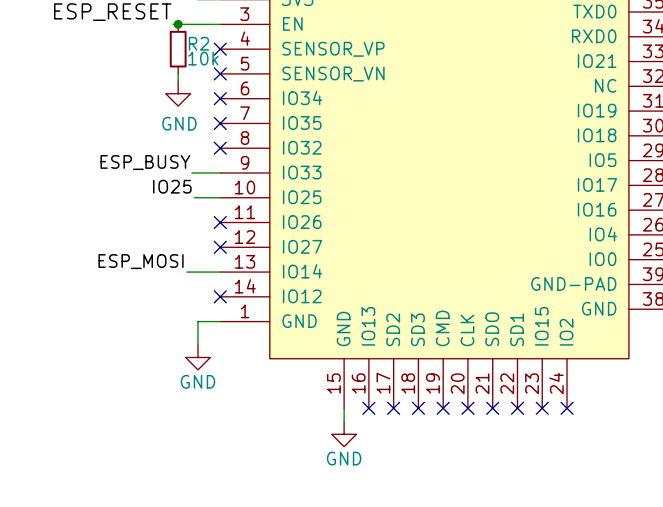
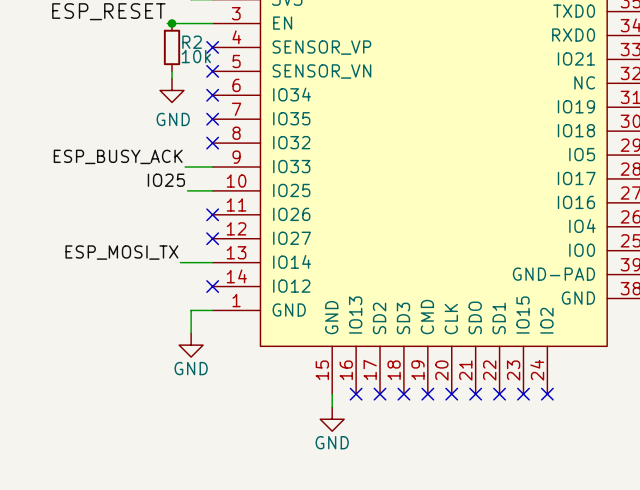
label: ESP_BUSY (145, 162) -> ESP_BUSY_ACK (118, 156)
label: ESP_MOSI (141, 261) -> ESP_MOSI_TX (121, 252)

